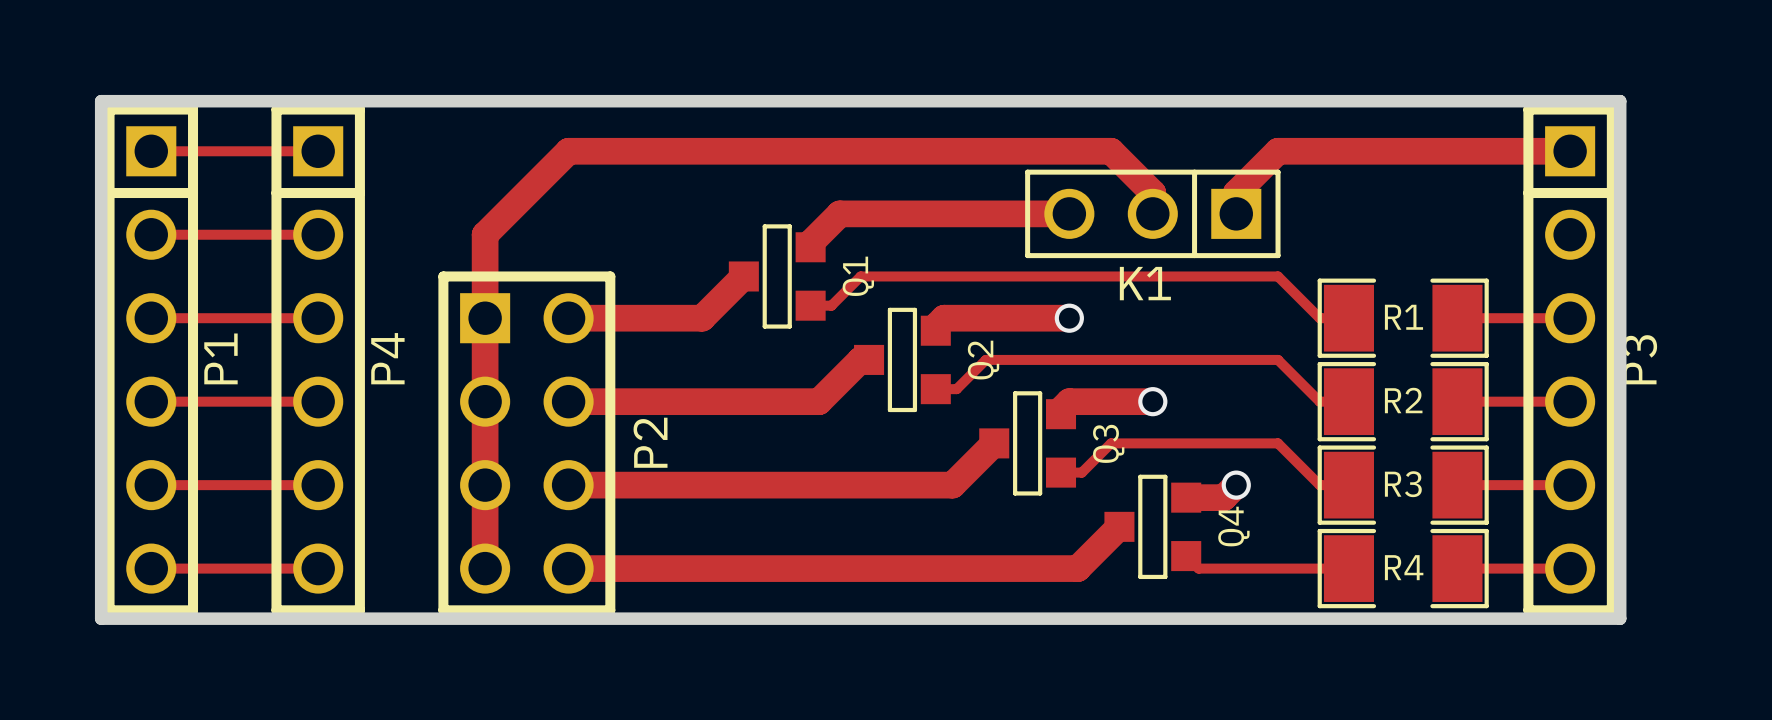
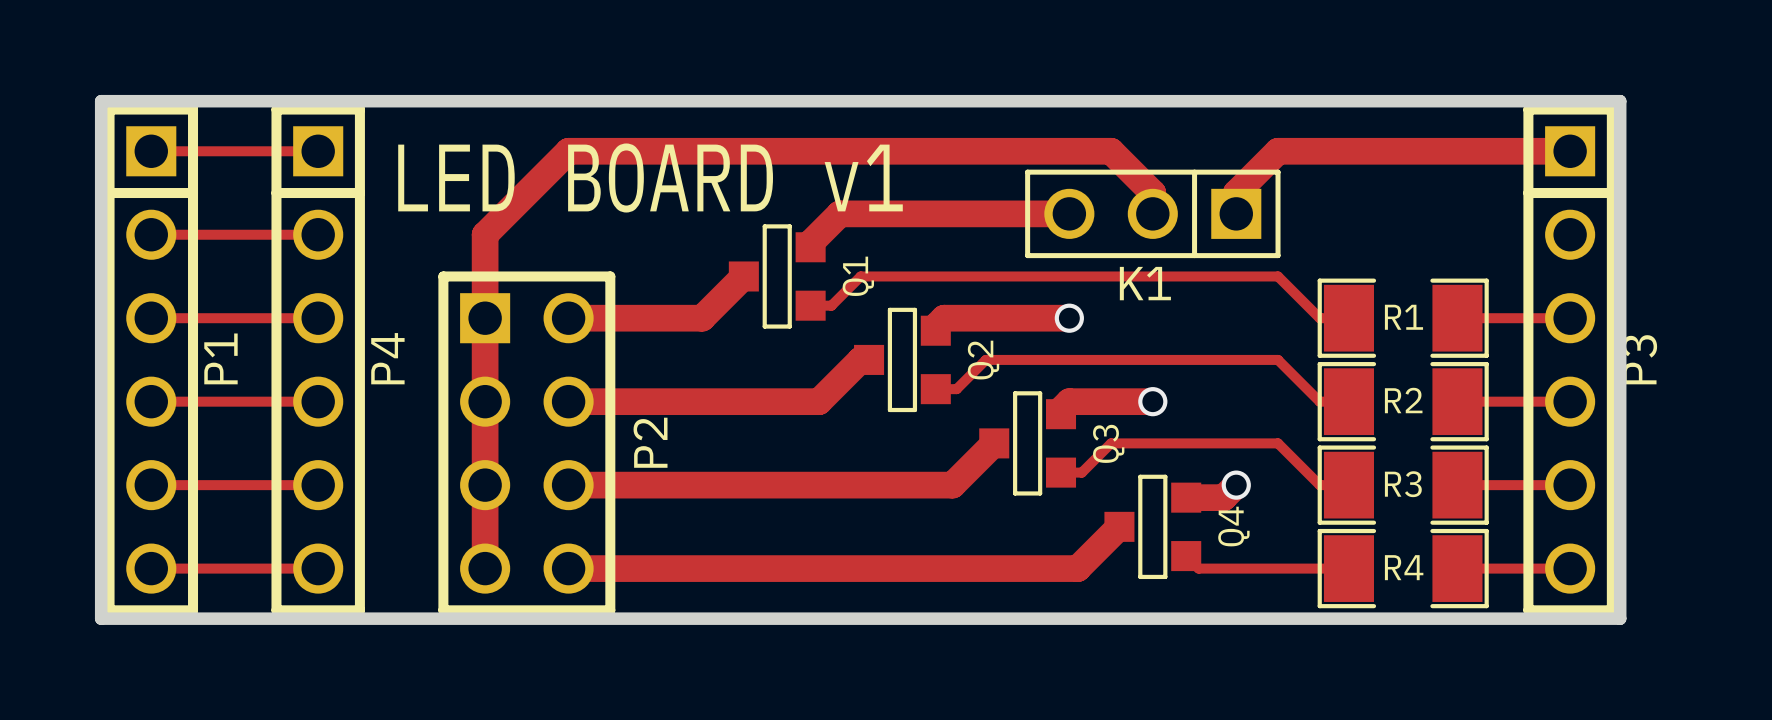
text: none -> LED BOARD v1 (650, 177)

